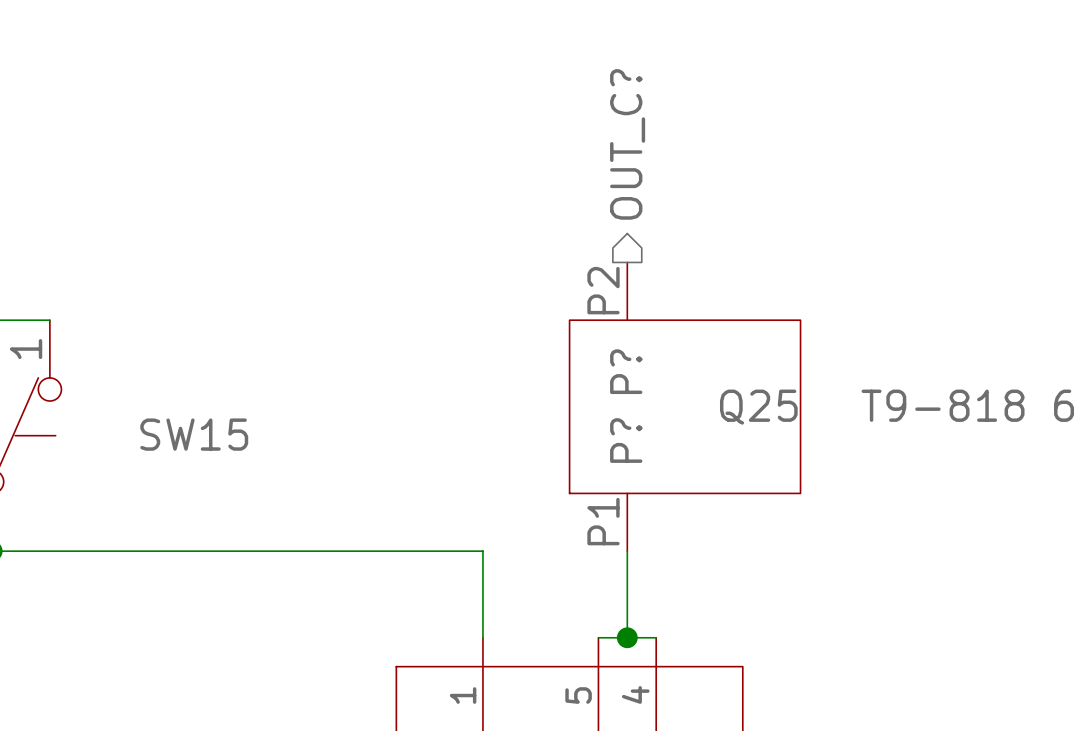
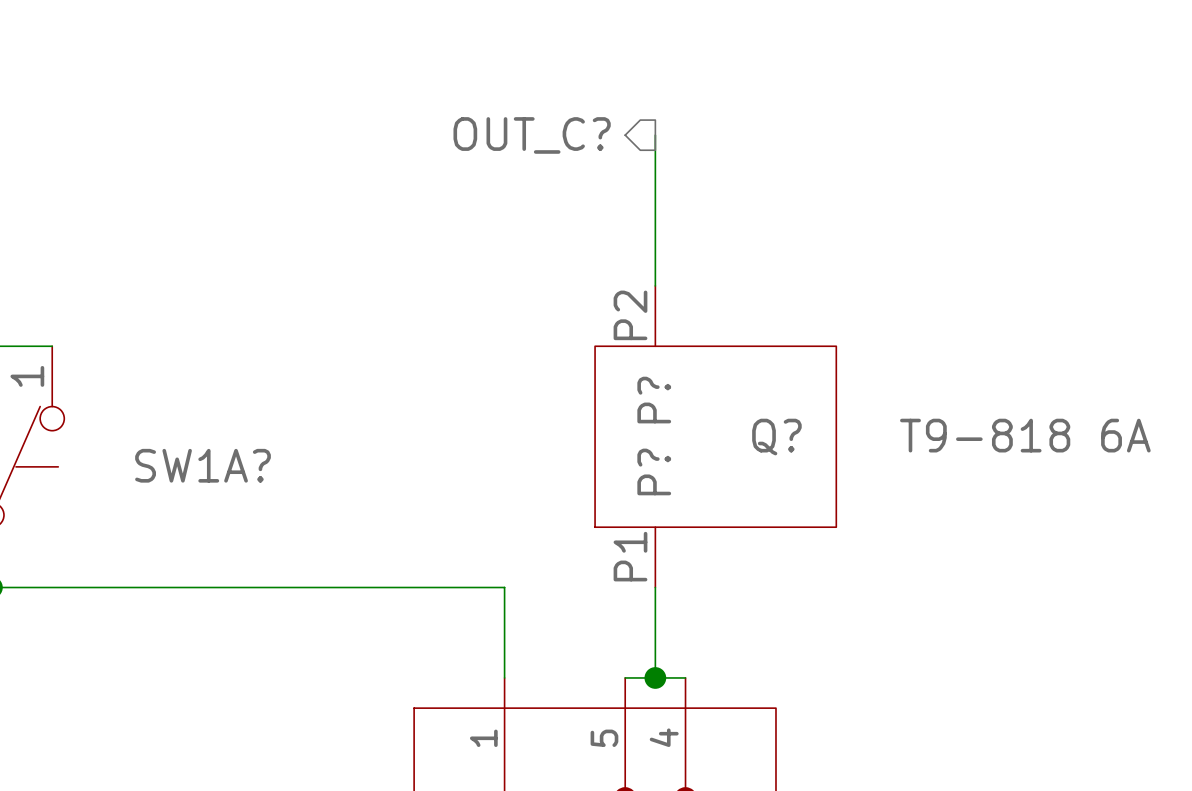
wire: none -> (655, 135) (655, 285)
hierarchical label rotation: 0° (627, 144) -> 90° counterclockwise (532, 135)
Q25 name: Q25 (758, 407) -> Q? (776, 437)
SW15 name: SW15 (194, 434) -> SW1A? (203, 465)

